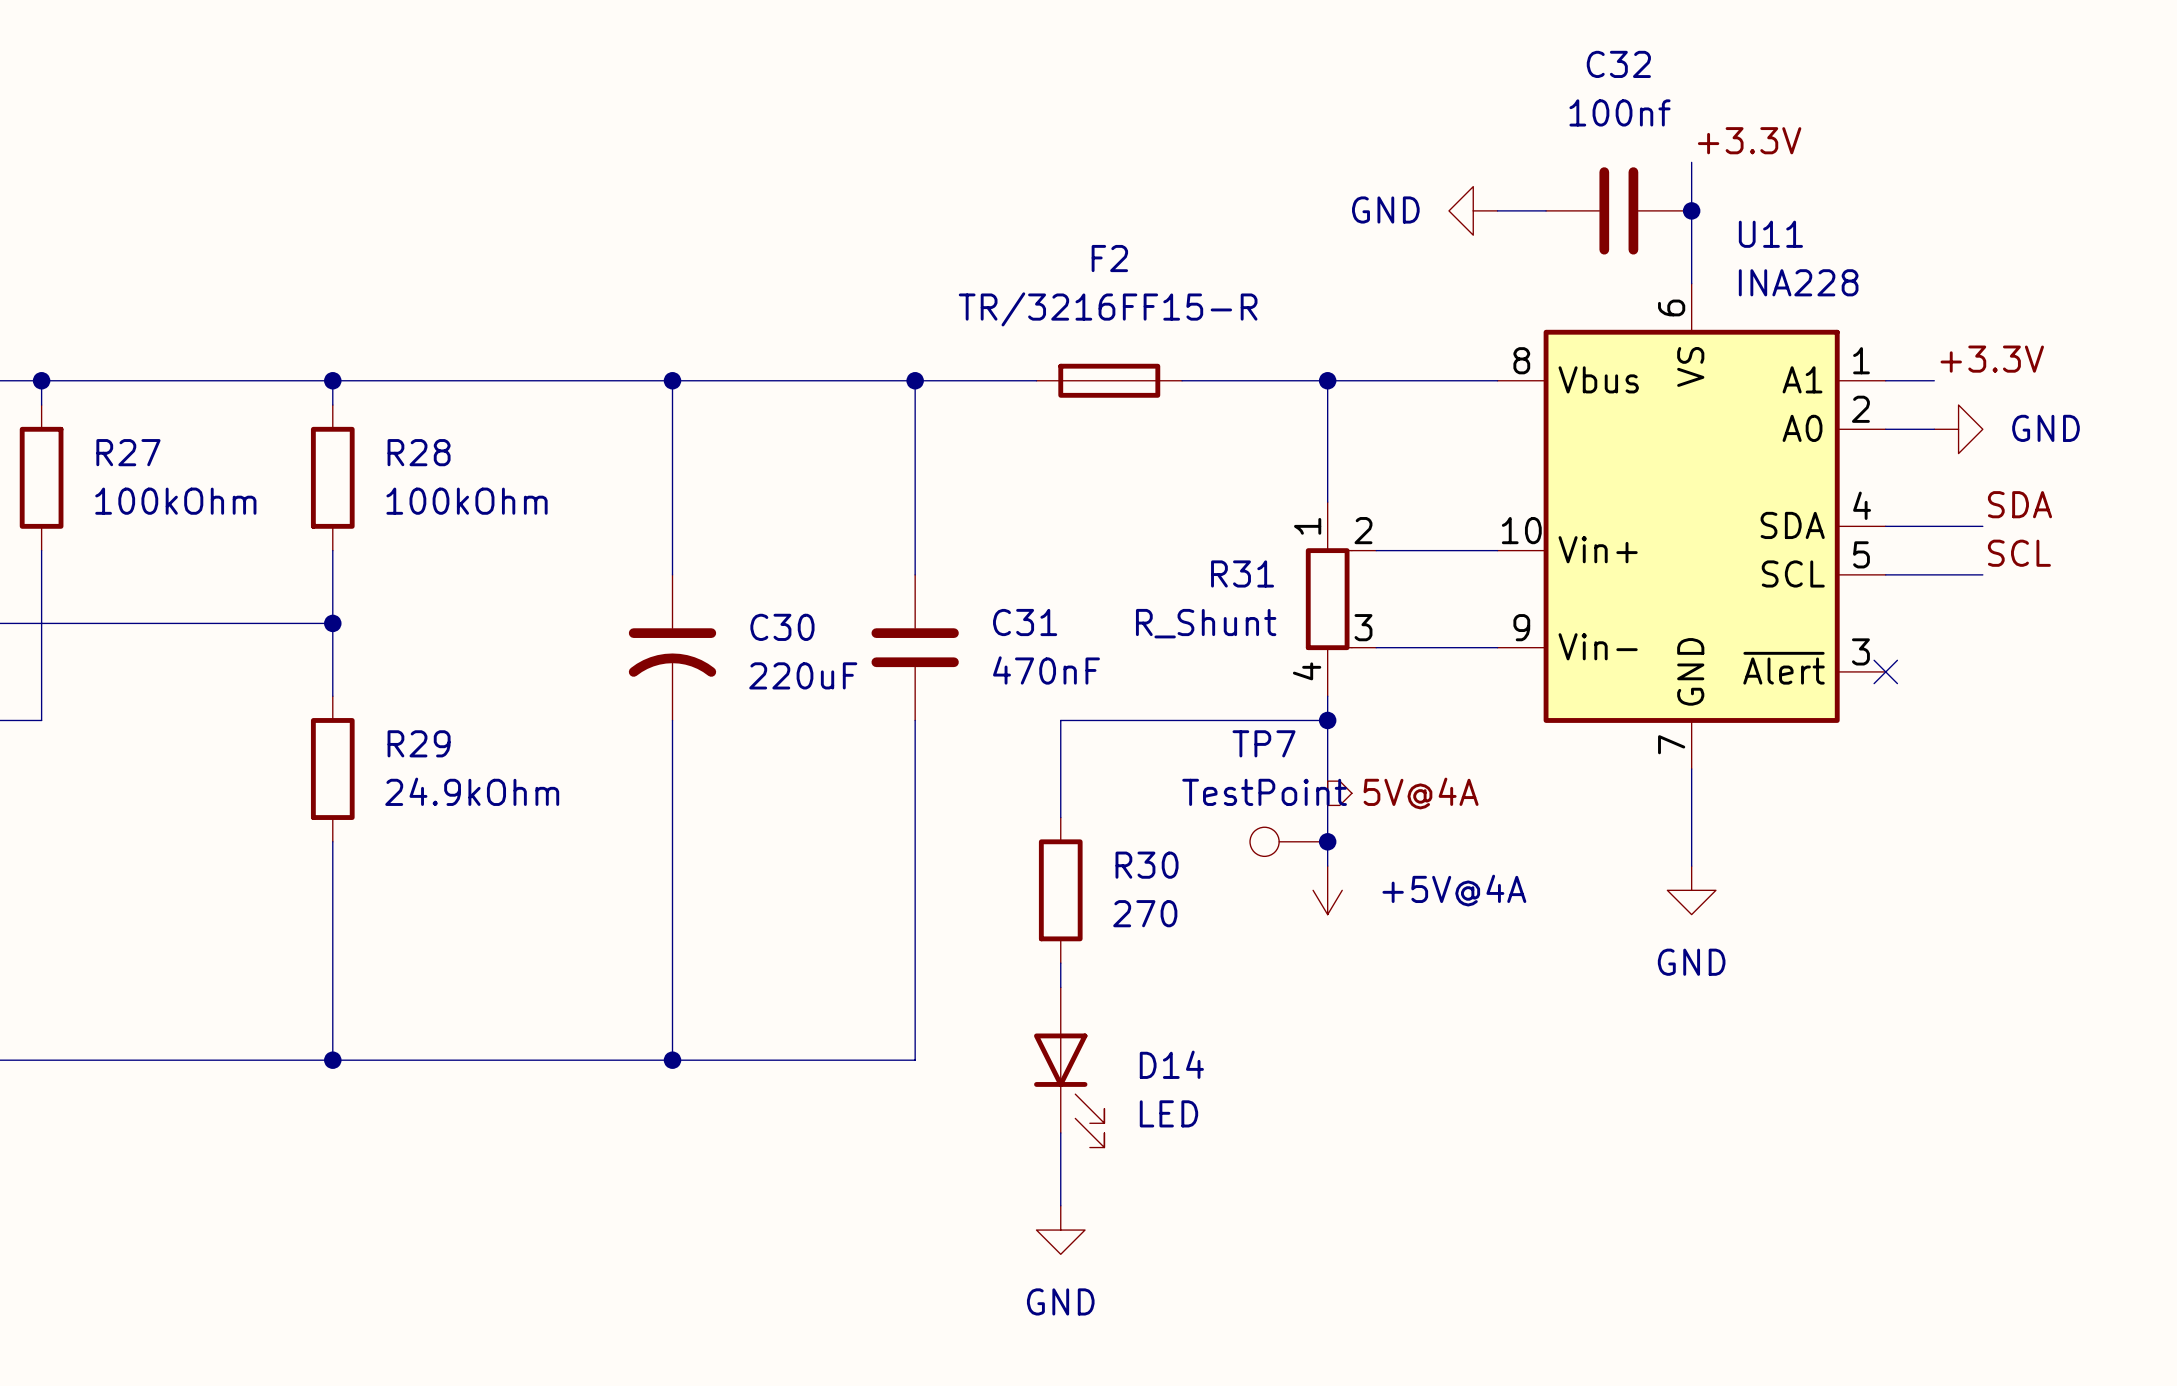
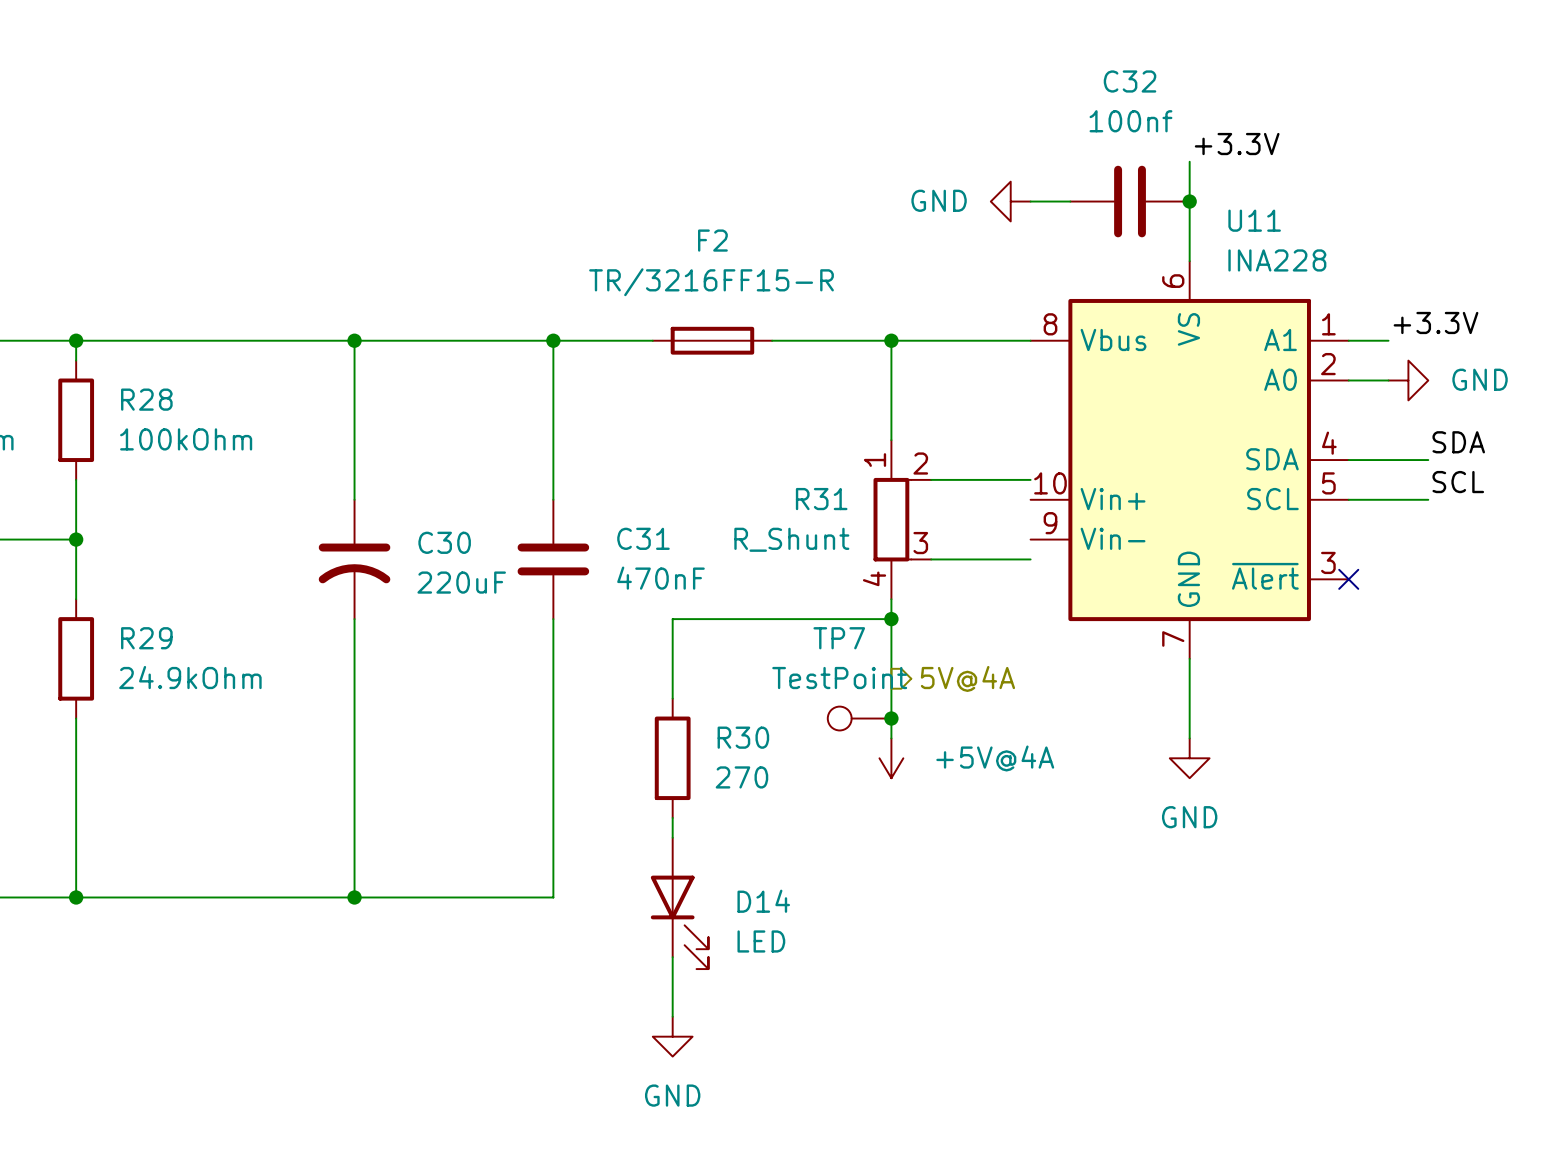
U11 symbol: [1497, 283, 1886, 770] -> [1030, 261, 1349, 659]

